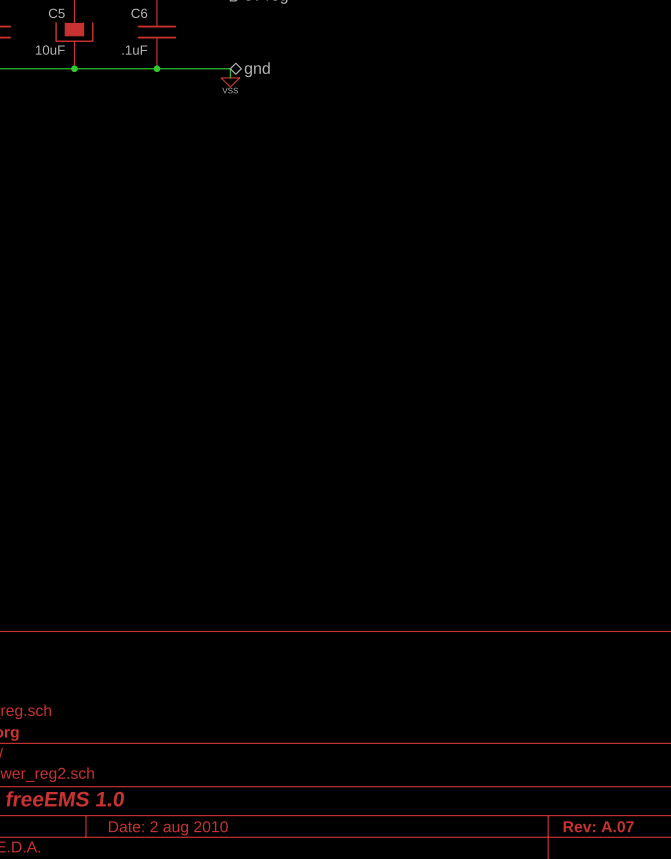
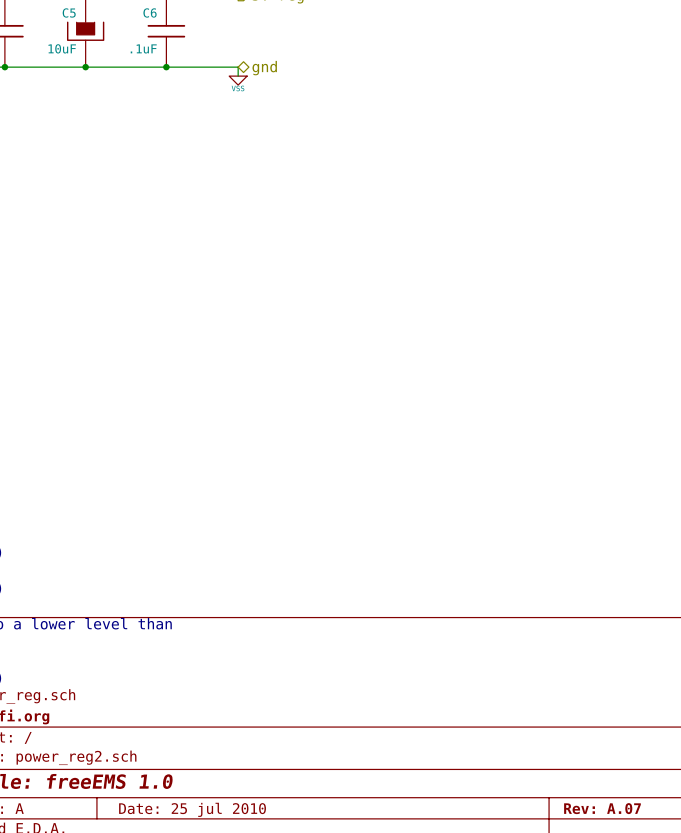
title block: Date: 2 aug 2010 (168, 828) -> Date: 25 jul 2010 (192, 809)

